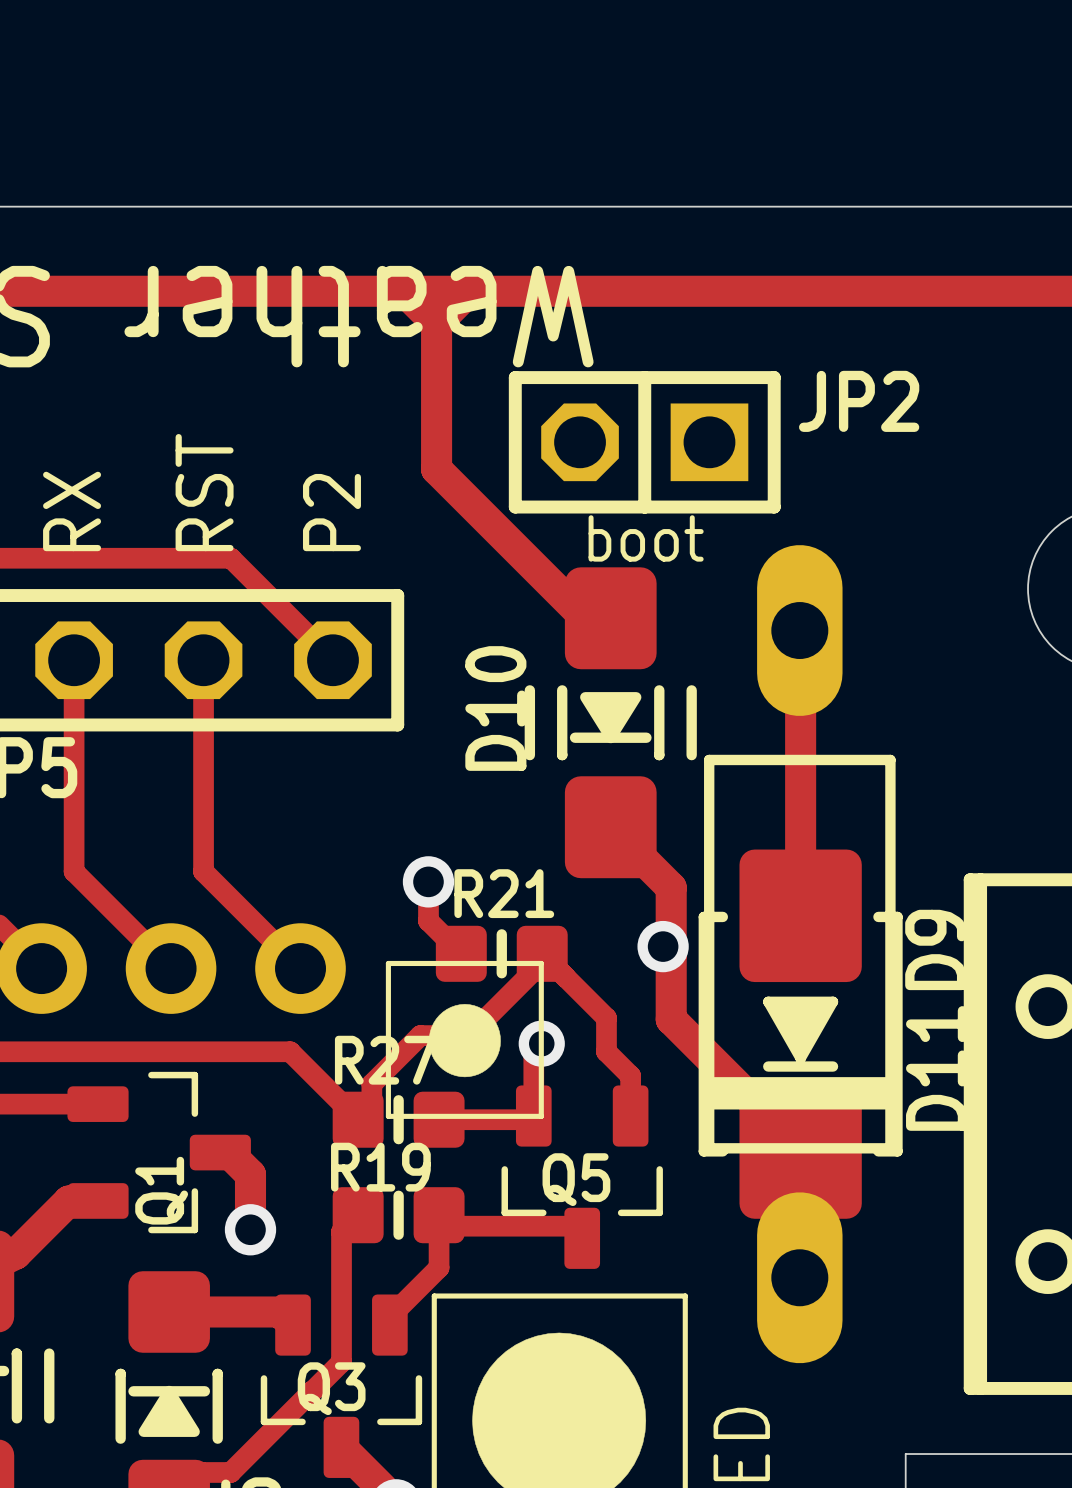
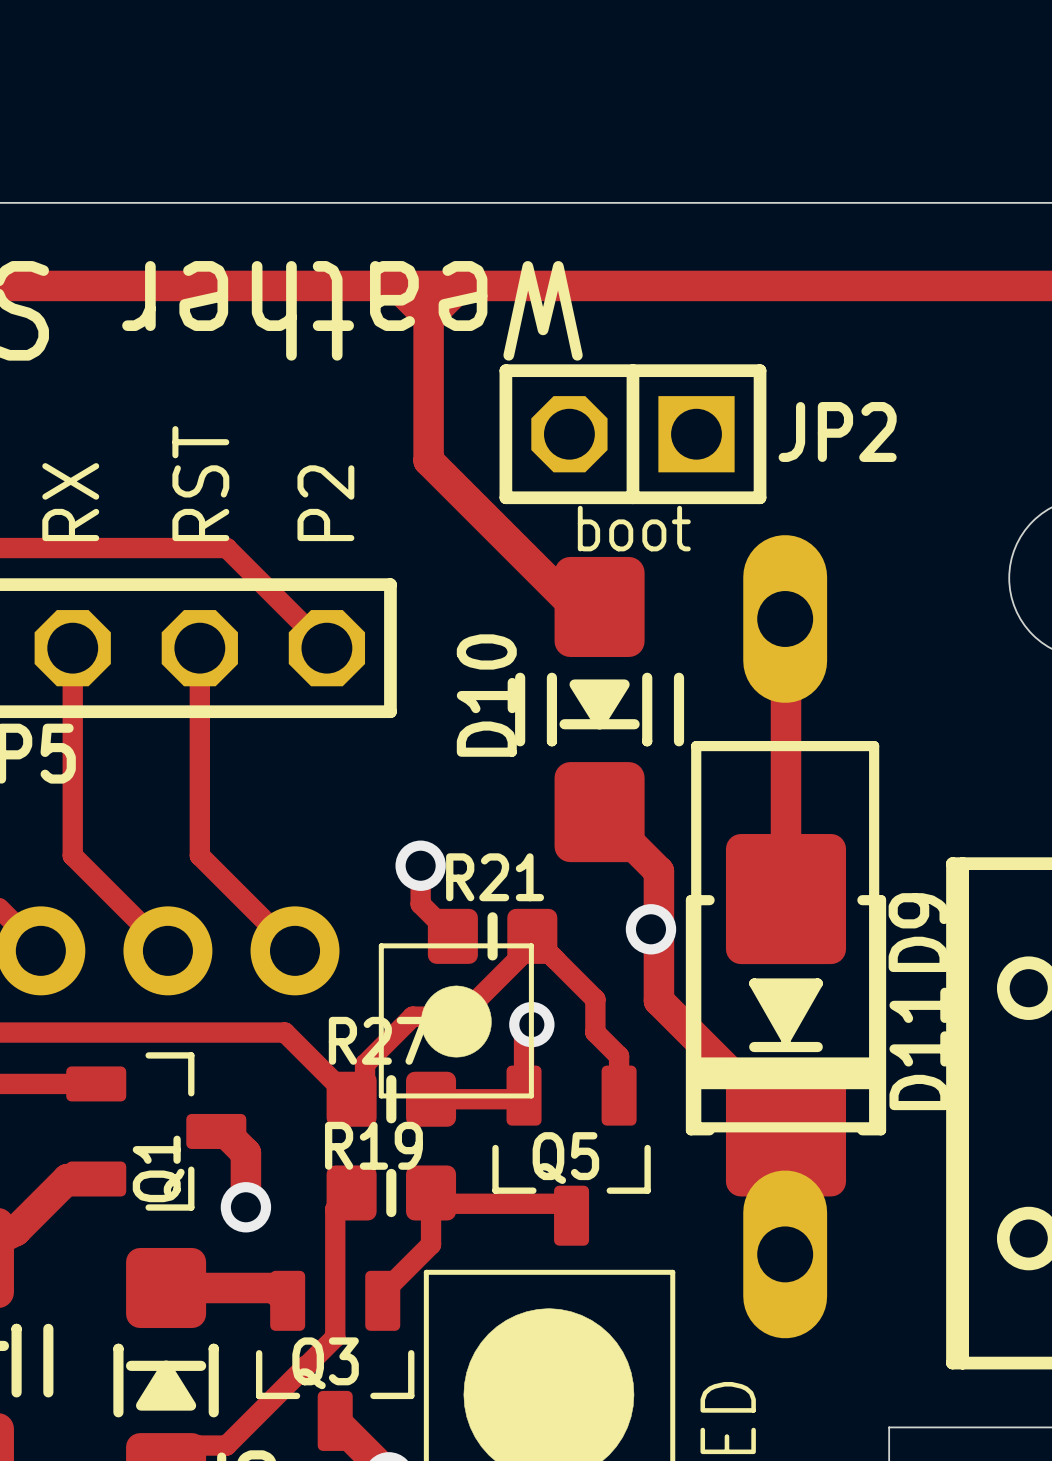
JP2 name position: JP2 (859, 401) -> JP2 (837, 431)

